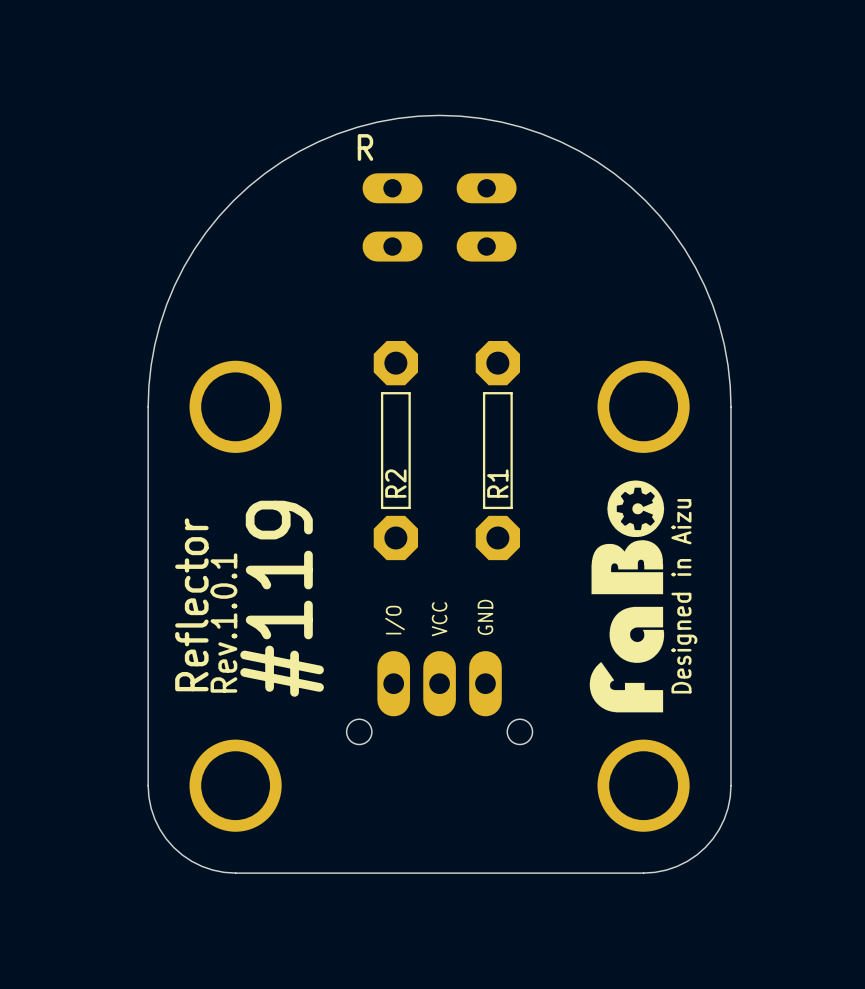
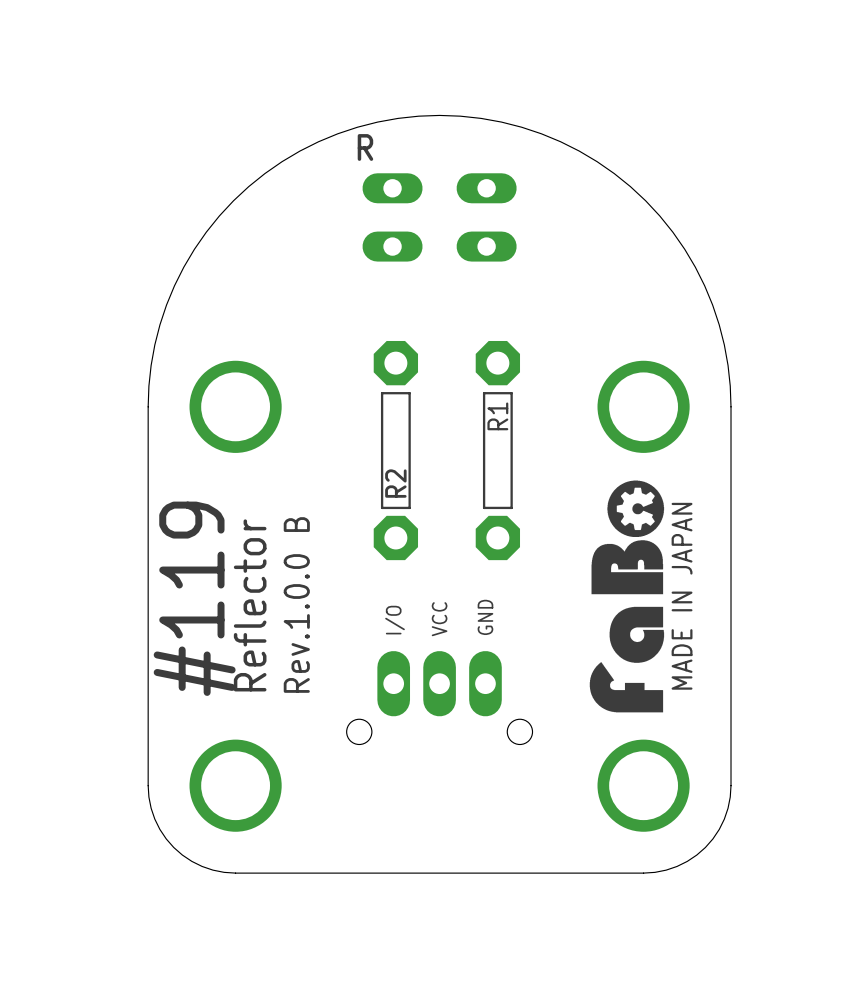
R1 name position: R1 (497, 483) -> R1 (497, 416)
text: Designed in Aizu (684, 596) -> MADE IN JAPAN (682, 596)
text position: #119 (282, 598) -> #119 (194, 598)
text position: Reflector (191, 604) -> Reflector (250, 605)
text: none -> Rev.1.0.0 B (296, 605)
text: Rev.1.0.1 (223, 623) -> none

